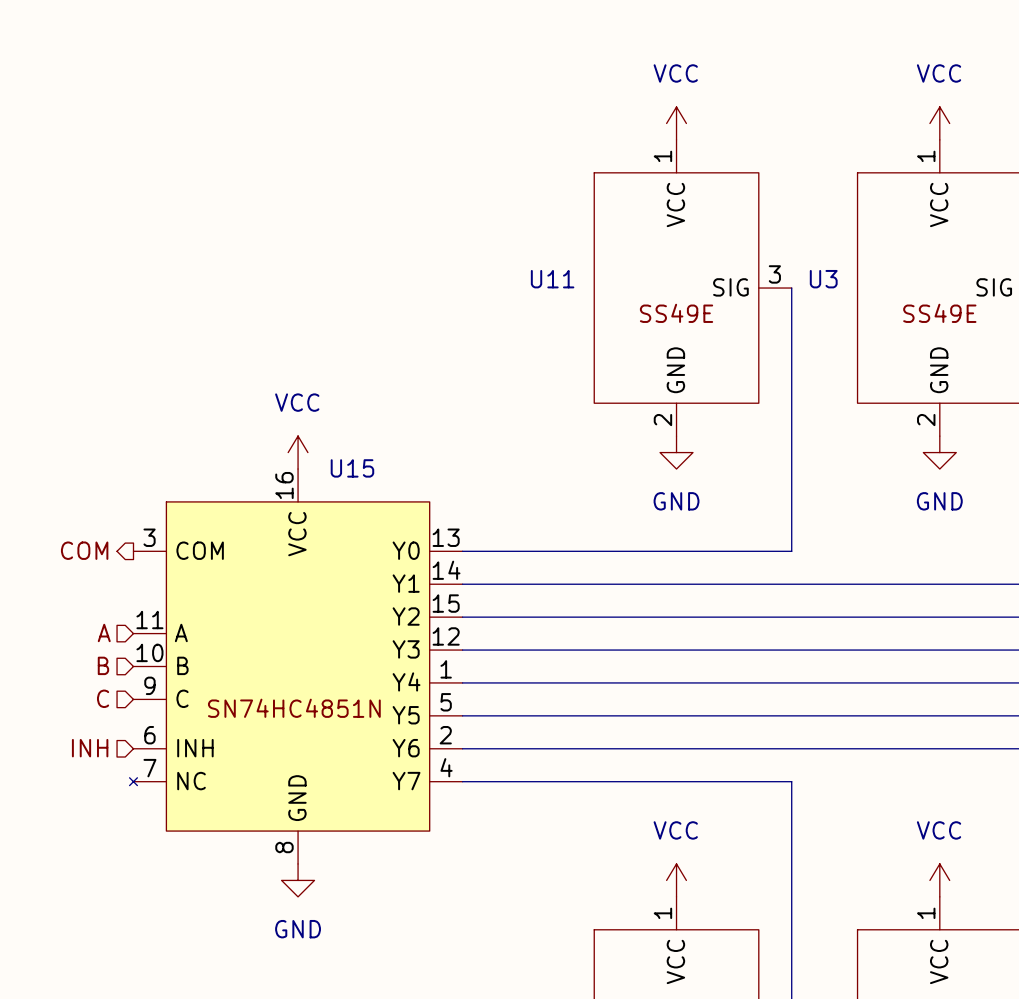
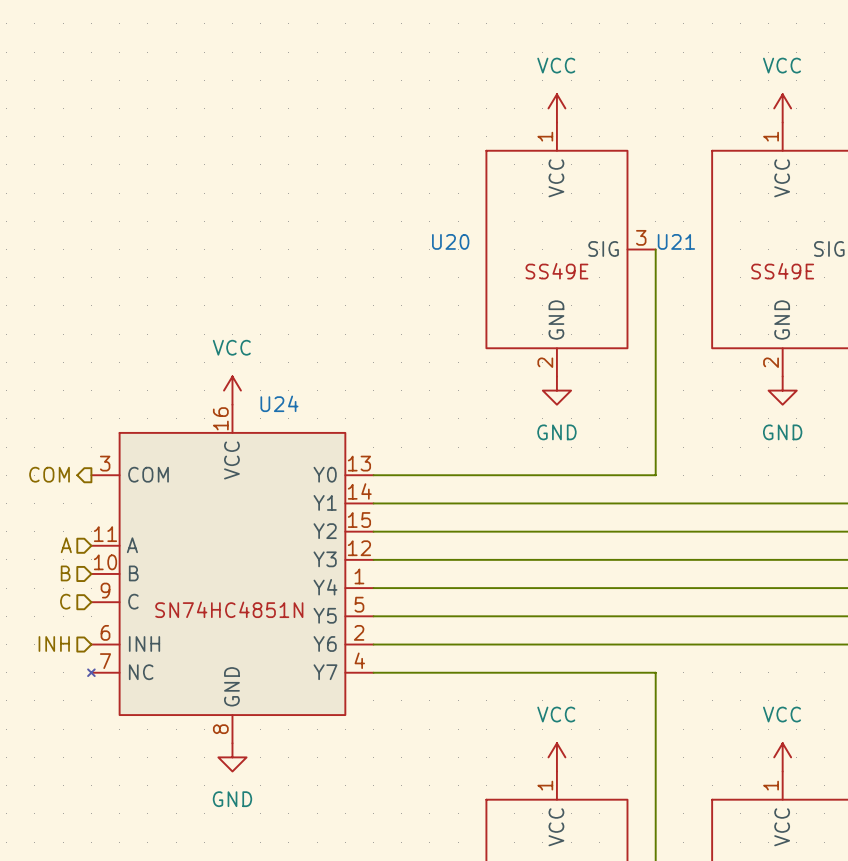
U11 name: U11 (552, 279) -> U20 (450, 241)
U3 name: U3 (823, 279) -> U21 (676, 241)
U15 name: U15 (352, 468) -> U24 (279, 403)

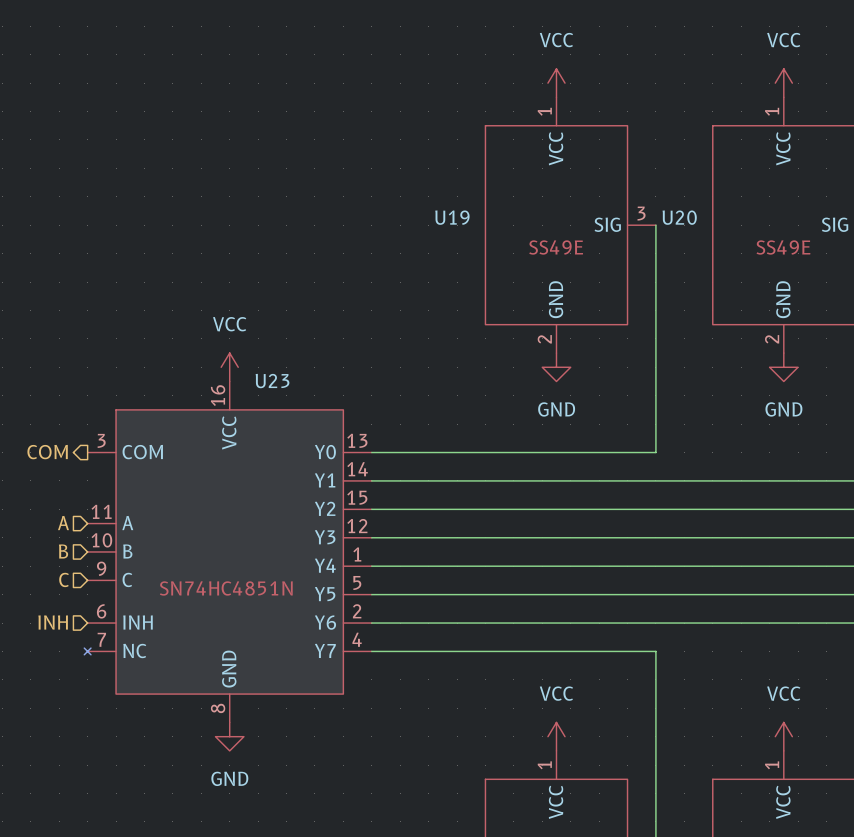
U20 name: U20 (450, 241) -> U19 (452, 217)
U21 name: U21 (676, 241) -> U20 (679, 217)
U24 name: U24 (279, 403) -> U23 (272, 381)

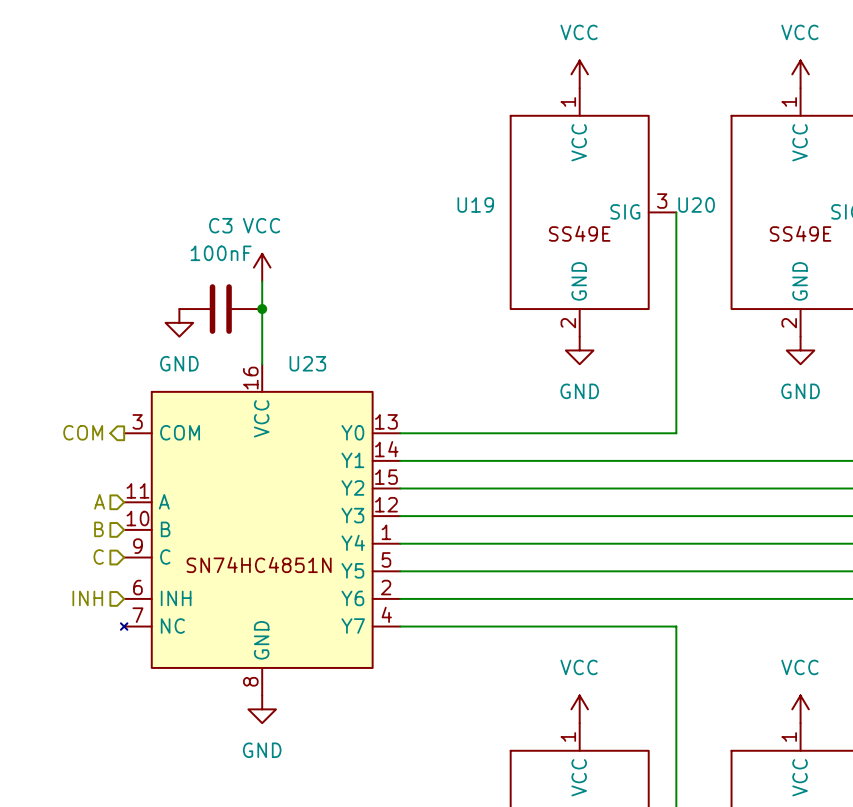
wire: none -> (262, 281) (262, 364)
C3: none -> 100nF (220, 309)
junction: none -> (262, 309)
power symbol: none -> GND (179, 322)
power symbol position: VCC (229, 367) -> VCC (262, 267)

